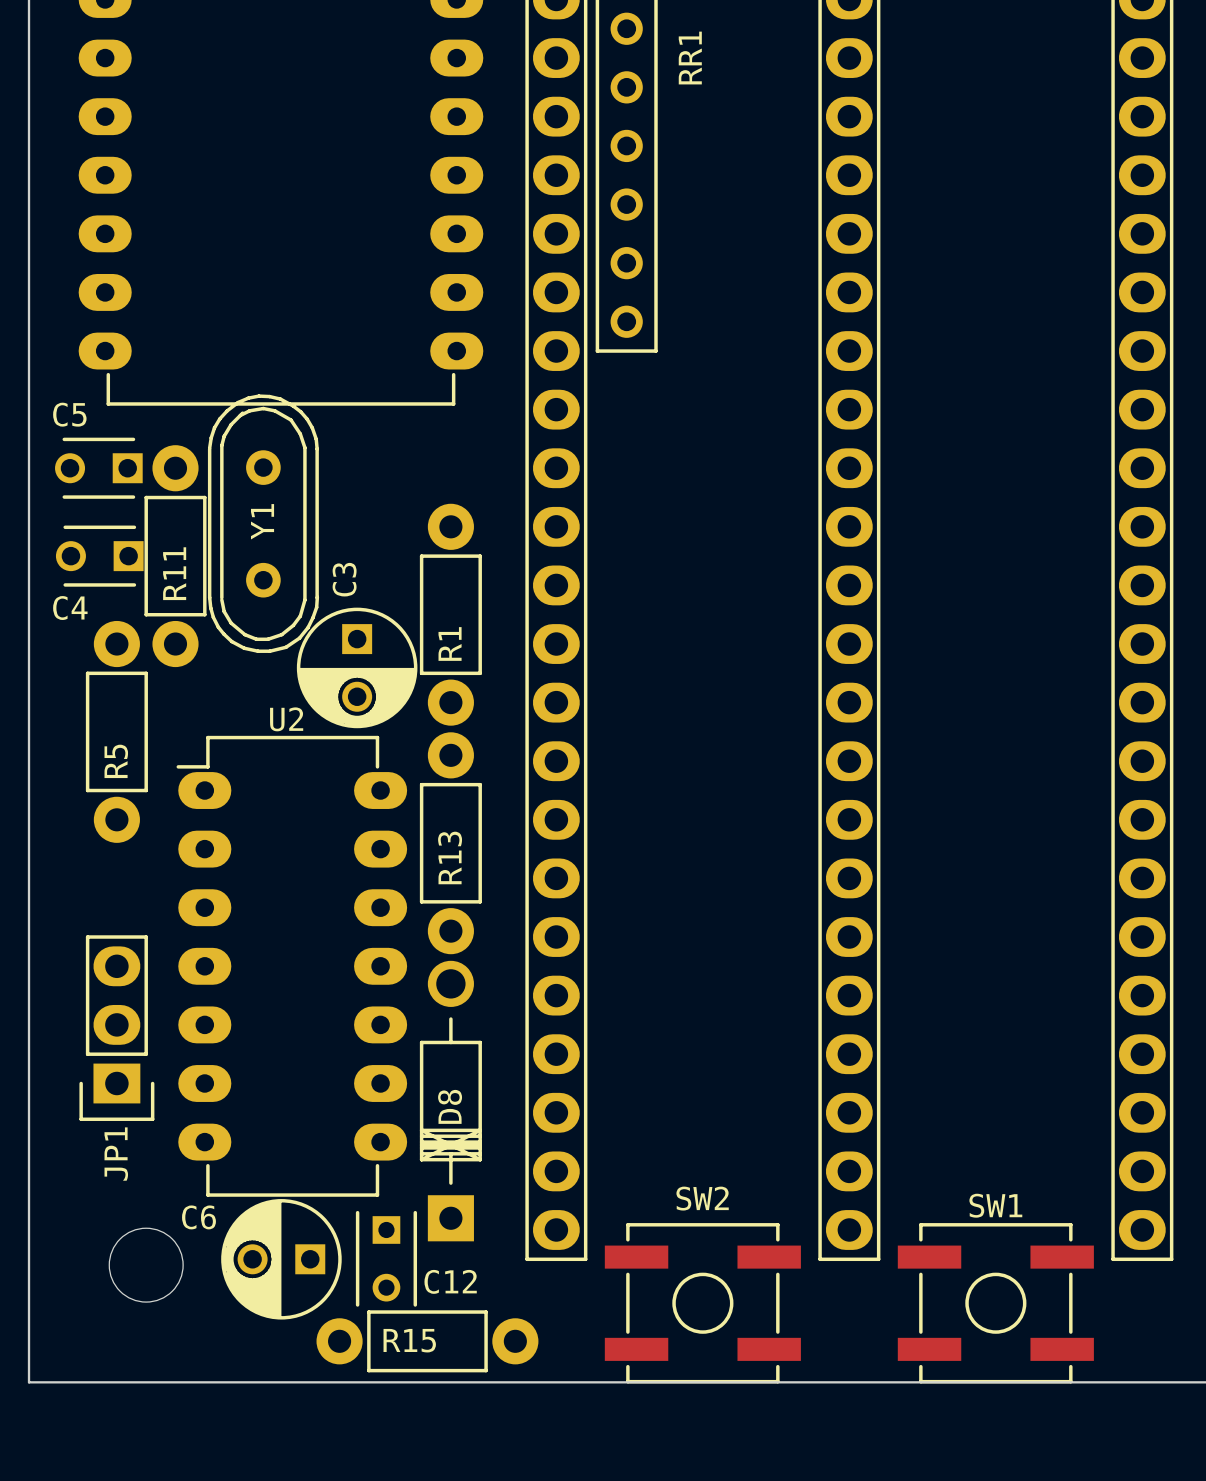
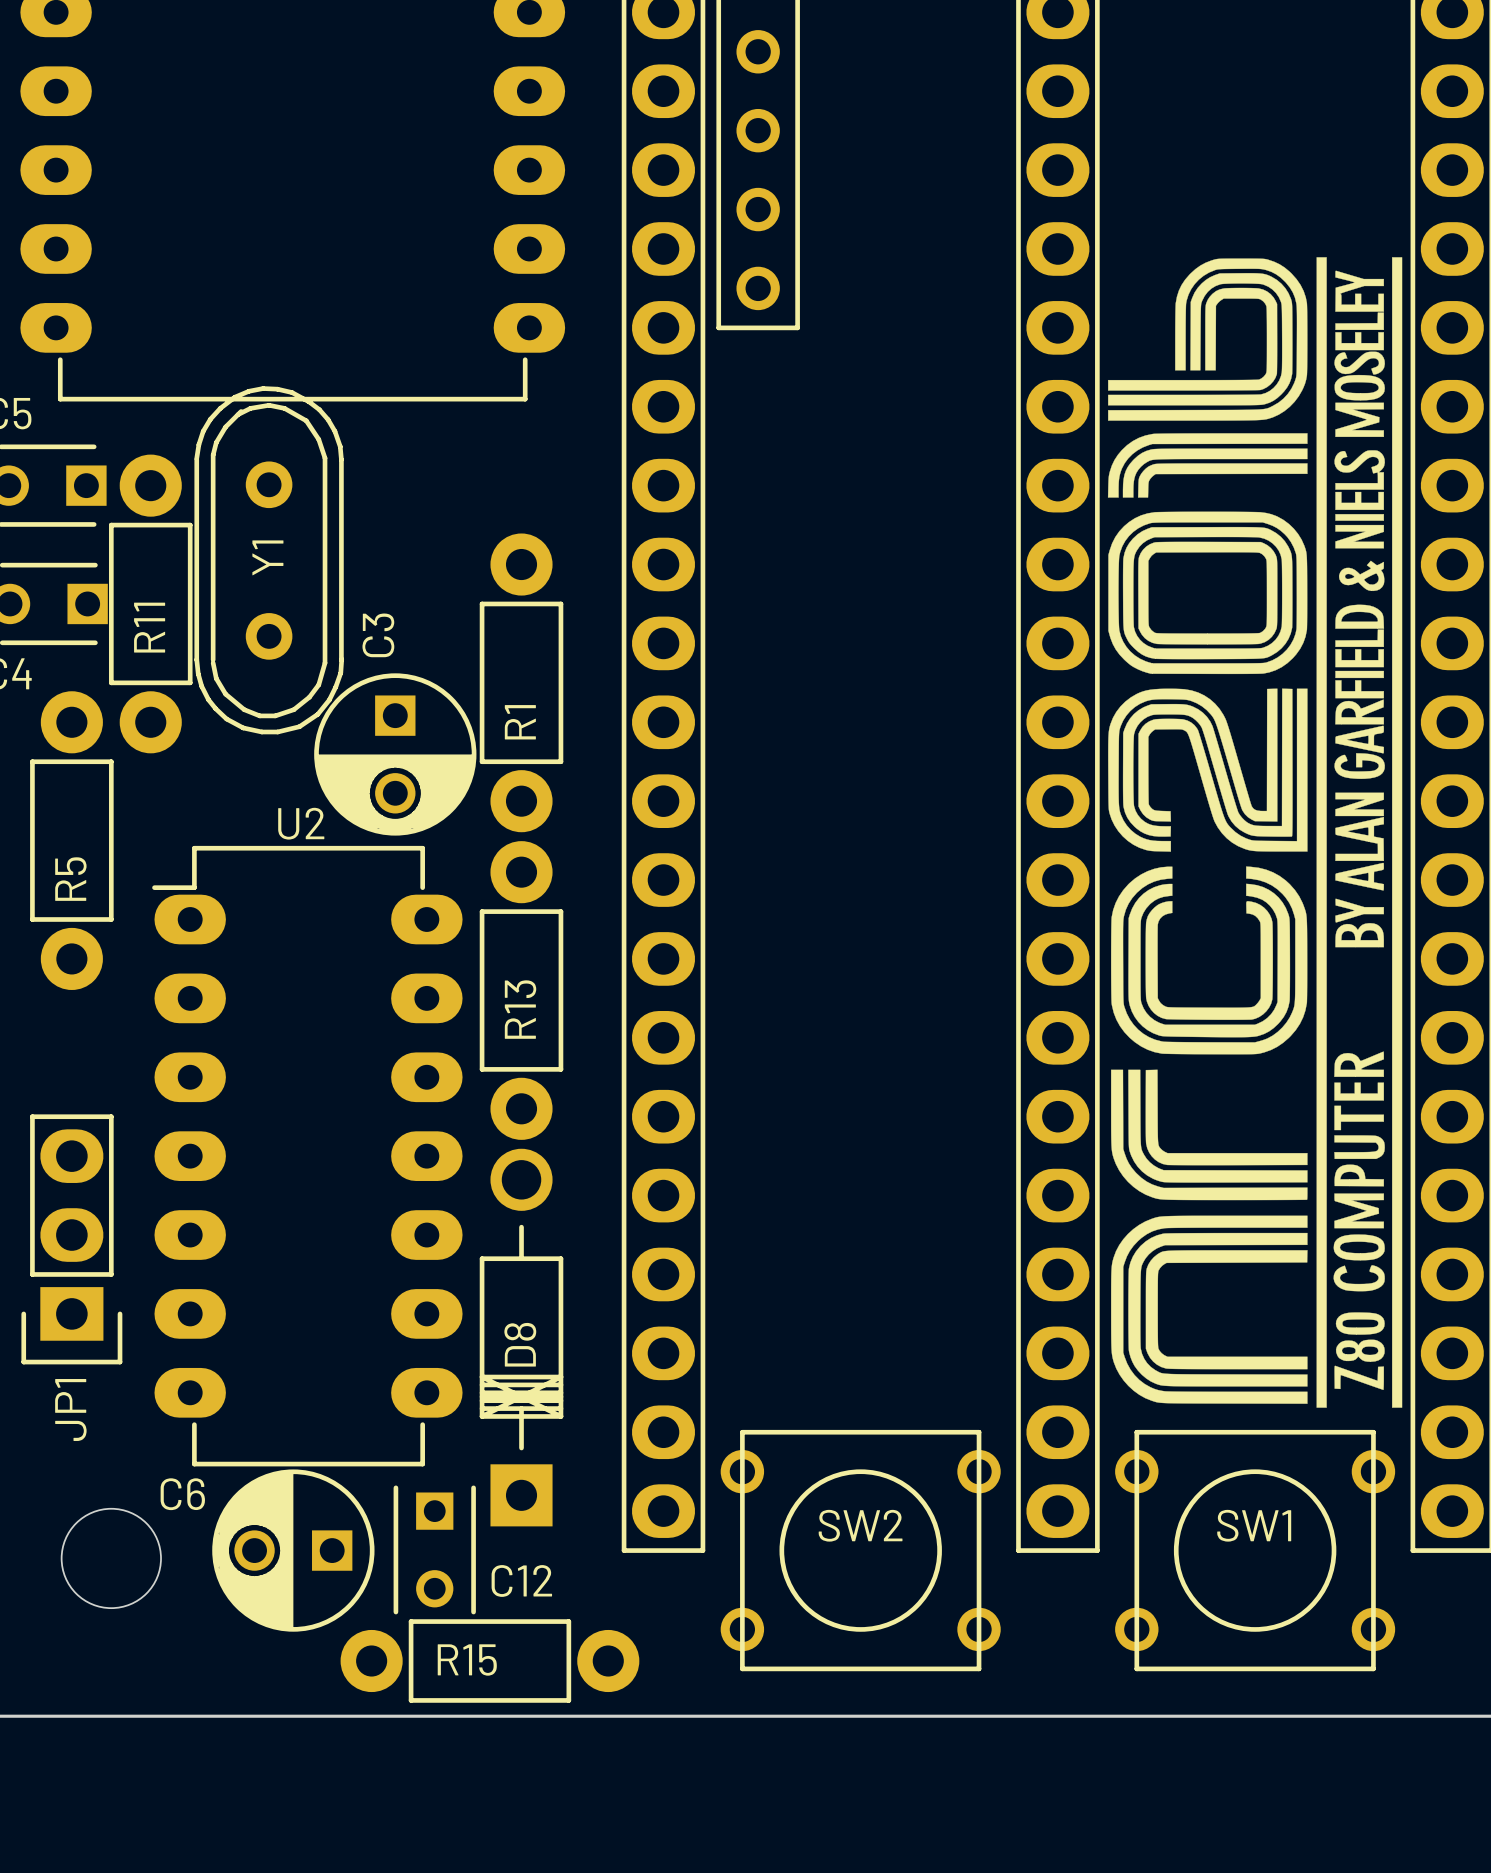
drawing: none -> [1107, 257, 1403, 1408]
SW2 name position: SW2 (702, 1198) -> SW2 (860, 1525)
SW1 name position: SW1 (995, 1205) -> SW1 (1254, 1525)
SW2 footprint: [604, 1223, 801, 1384] -> [720, 1429, 1001, 1672]
SW1 footprint: [897, 1223, 1094, 1384] -> [1115, 1429, 1396, 1672]

